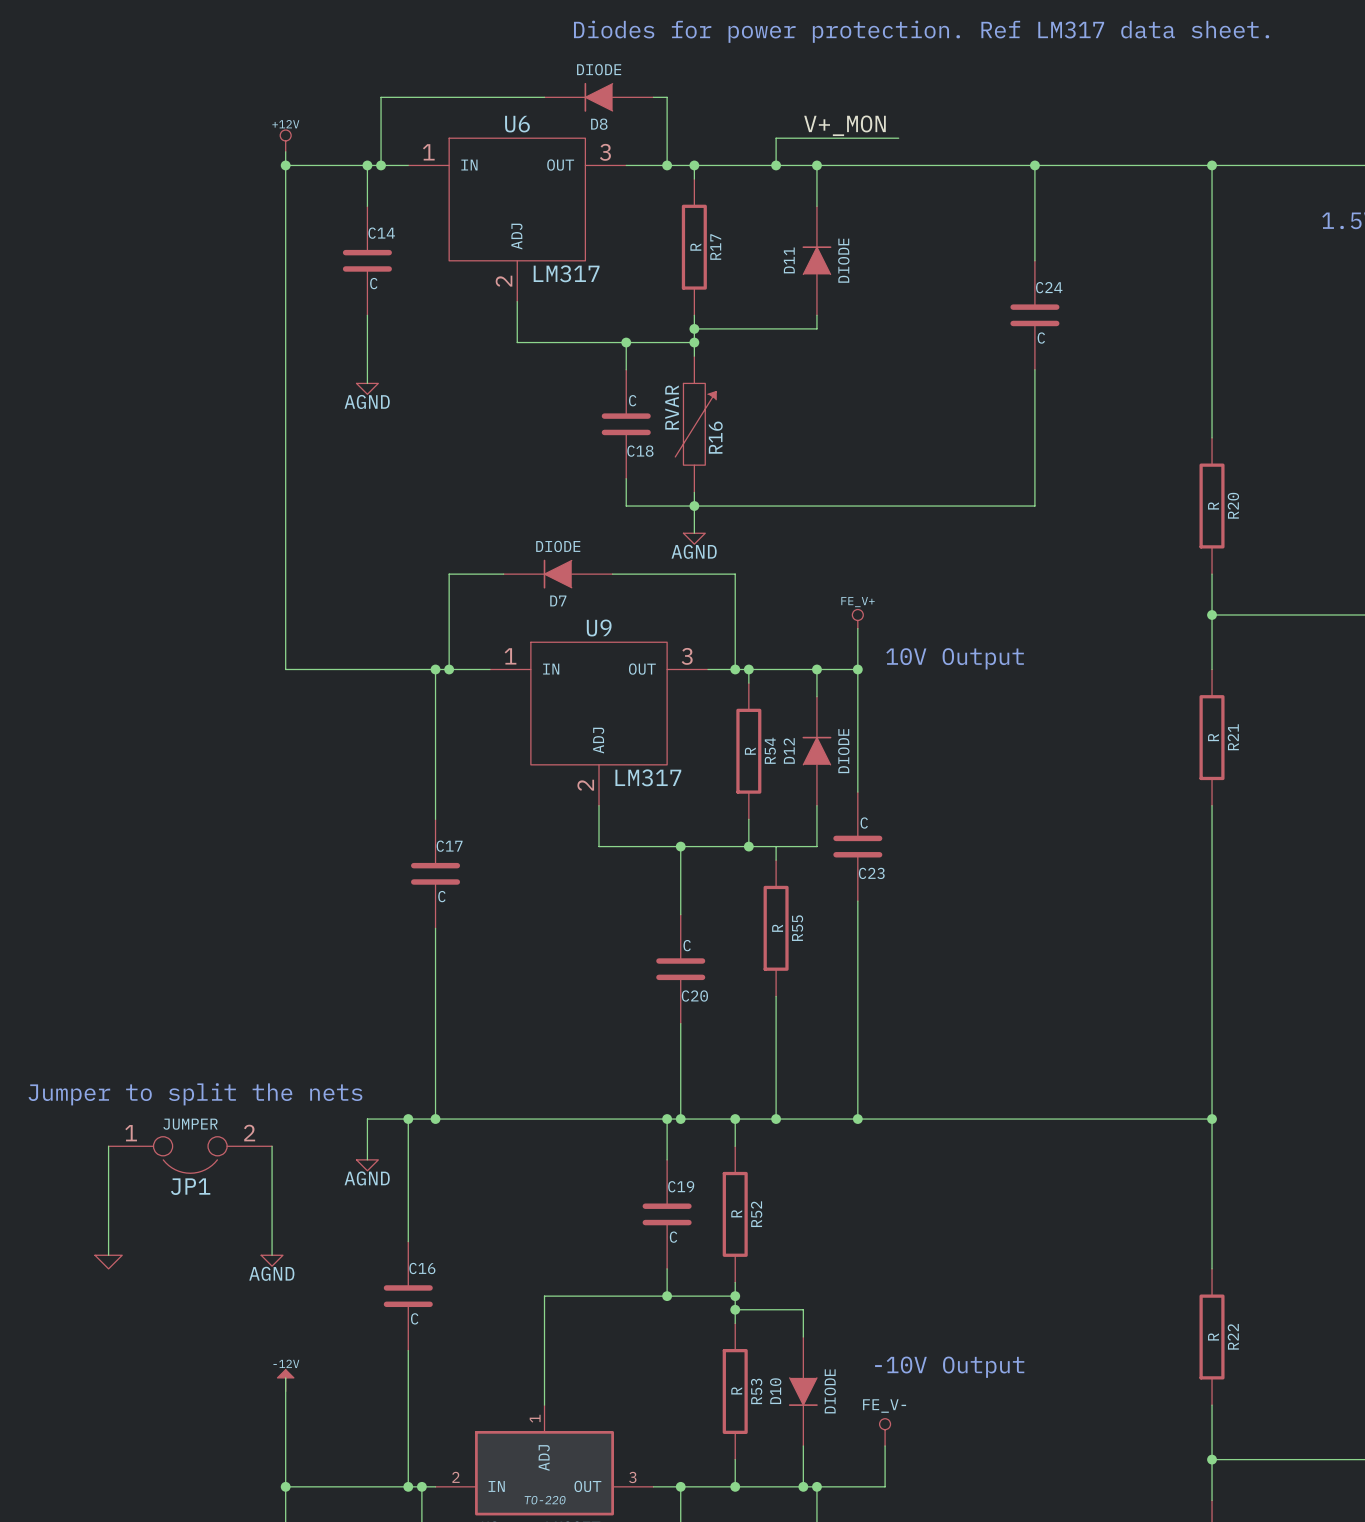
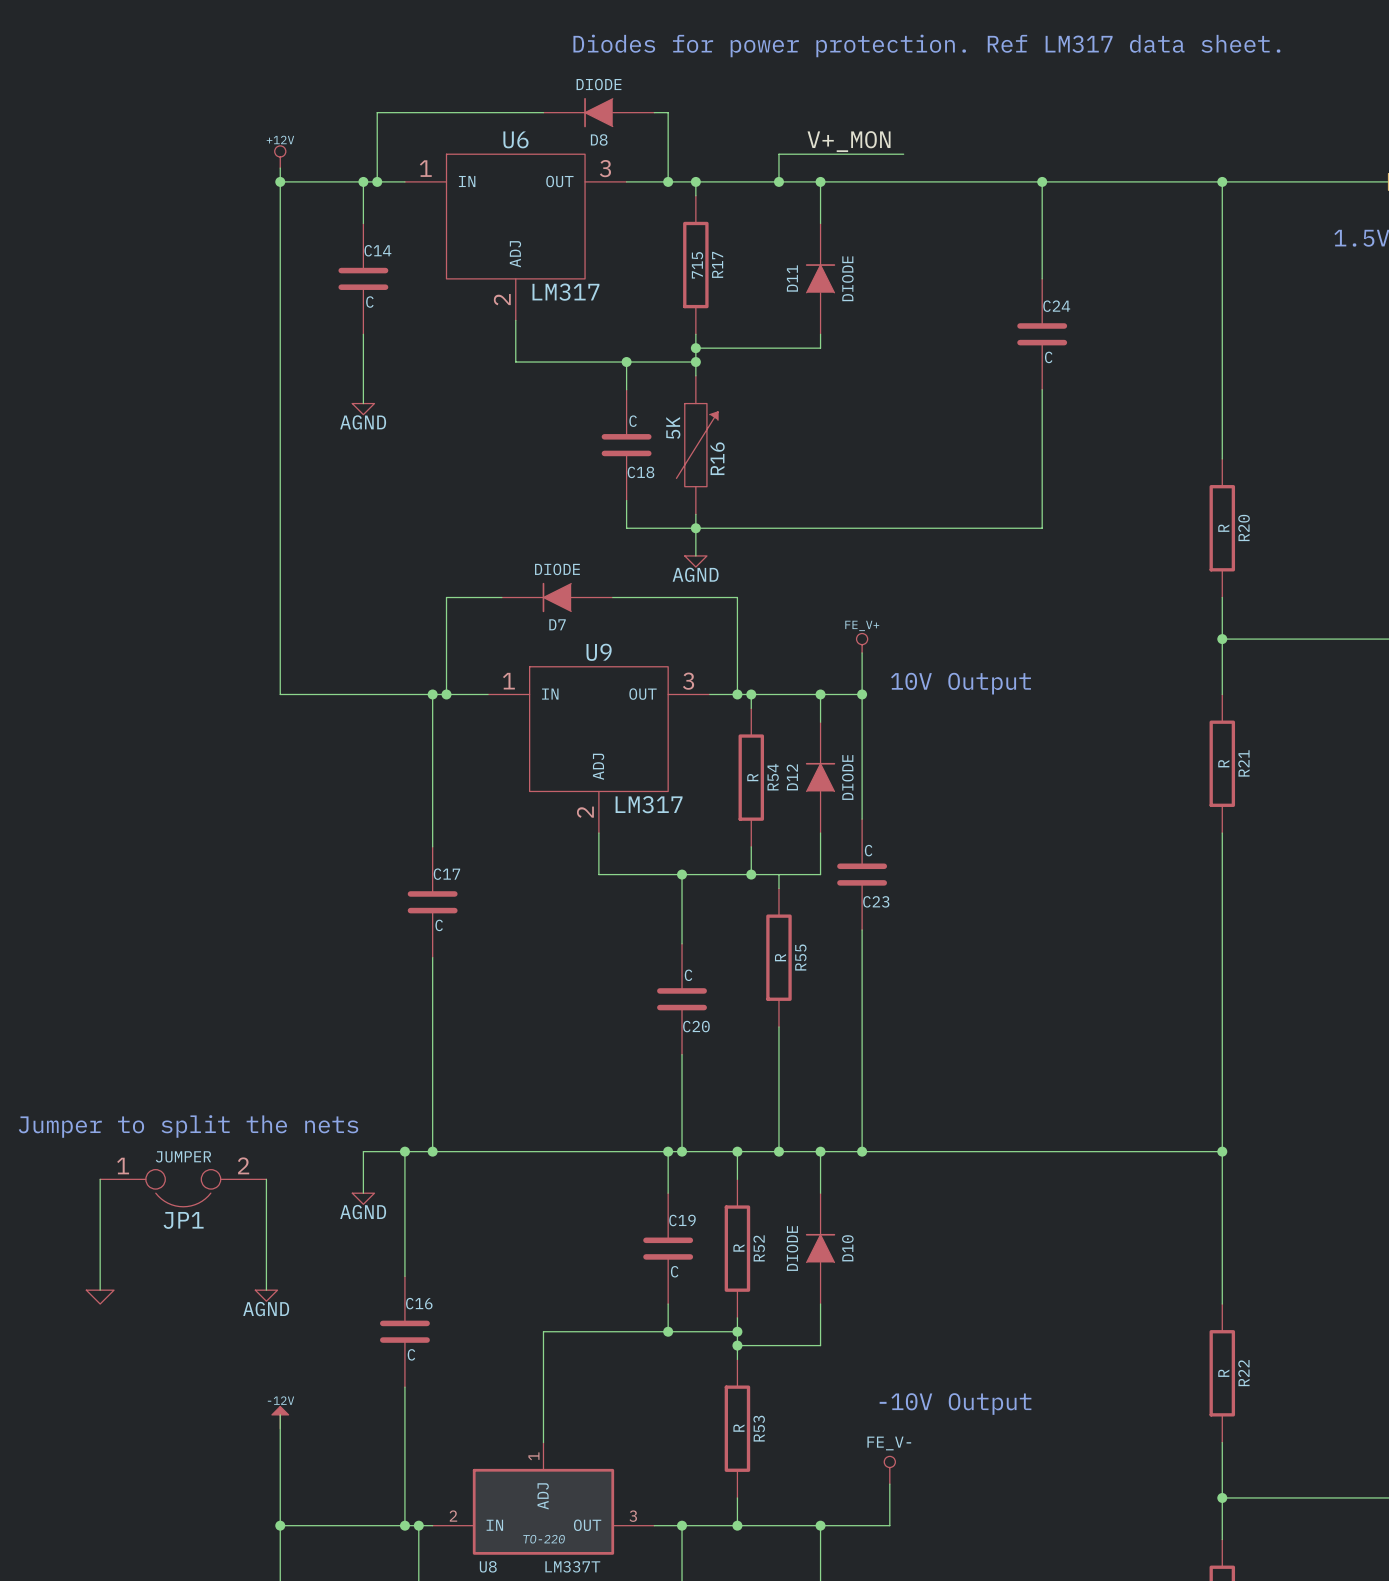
R17 value: R (695, 247) -> 715 (697, 265)
R16 value: RVAR (672, 407) -> 5K (673, 428)
wire: none -> (820, 1151) (820, 1193)
junction: none -> (820, 1151)
wire: (803, 1309) (803, 1337) -> (806, 1345) (820, 1345) (820, 1304)
D10 rotation: 0° (803, 1391) -> 180° (820, 1248)
D10 position: (803, 1391) -> (820, 1248)
wire: (803, 1445) (803, 1486) -> none
junction: (803, 1486) -> none

